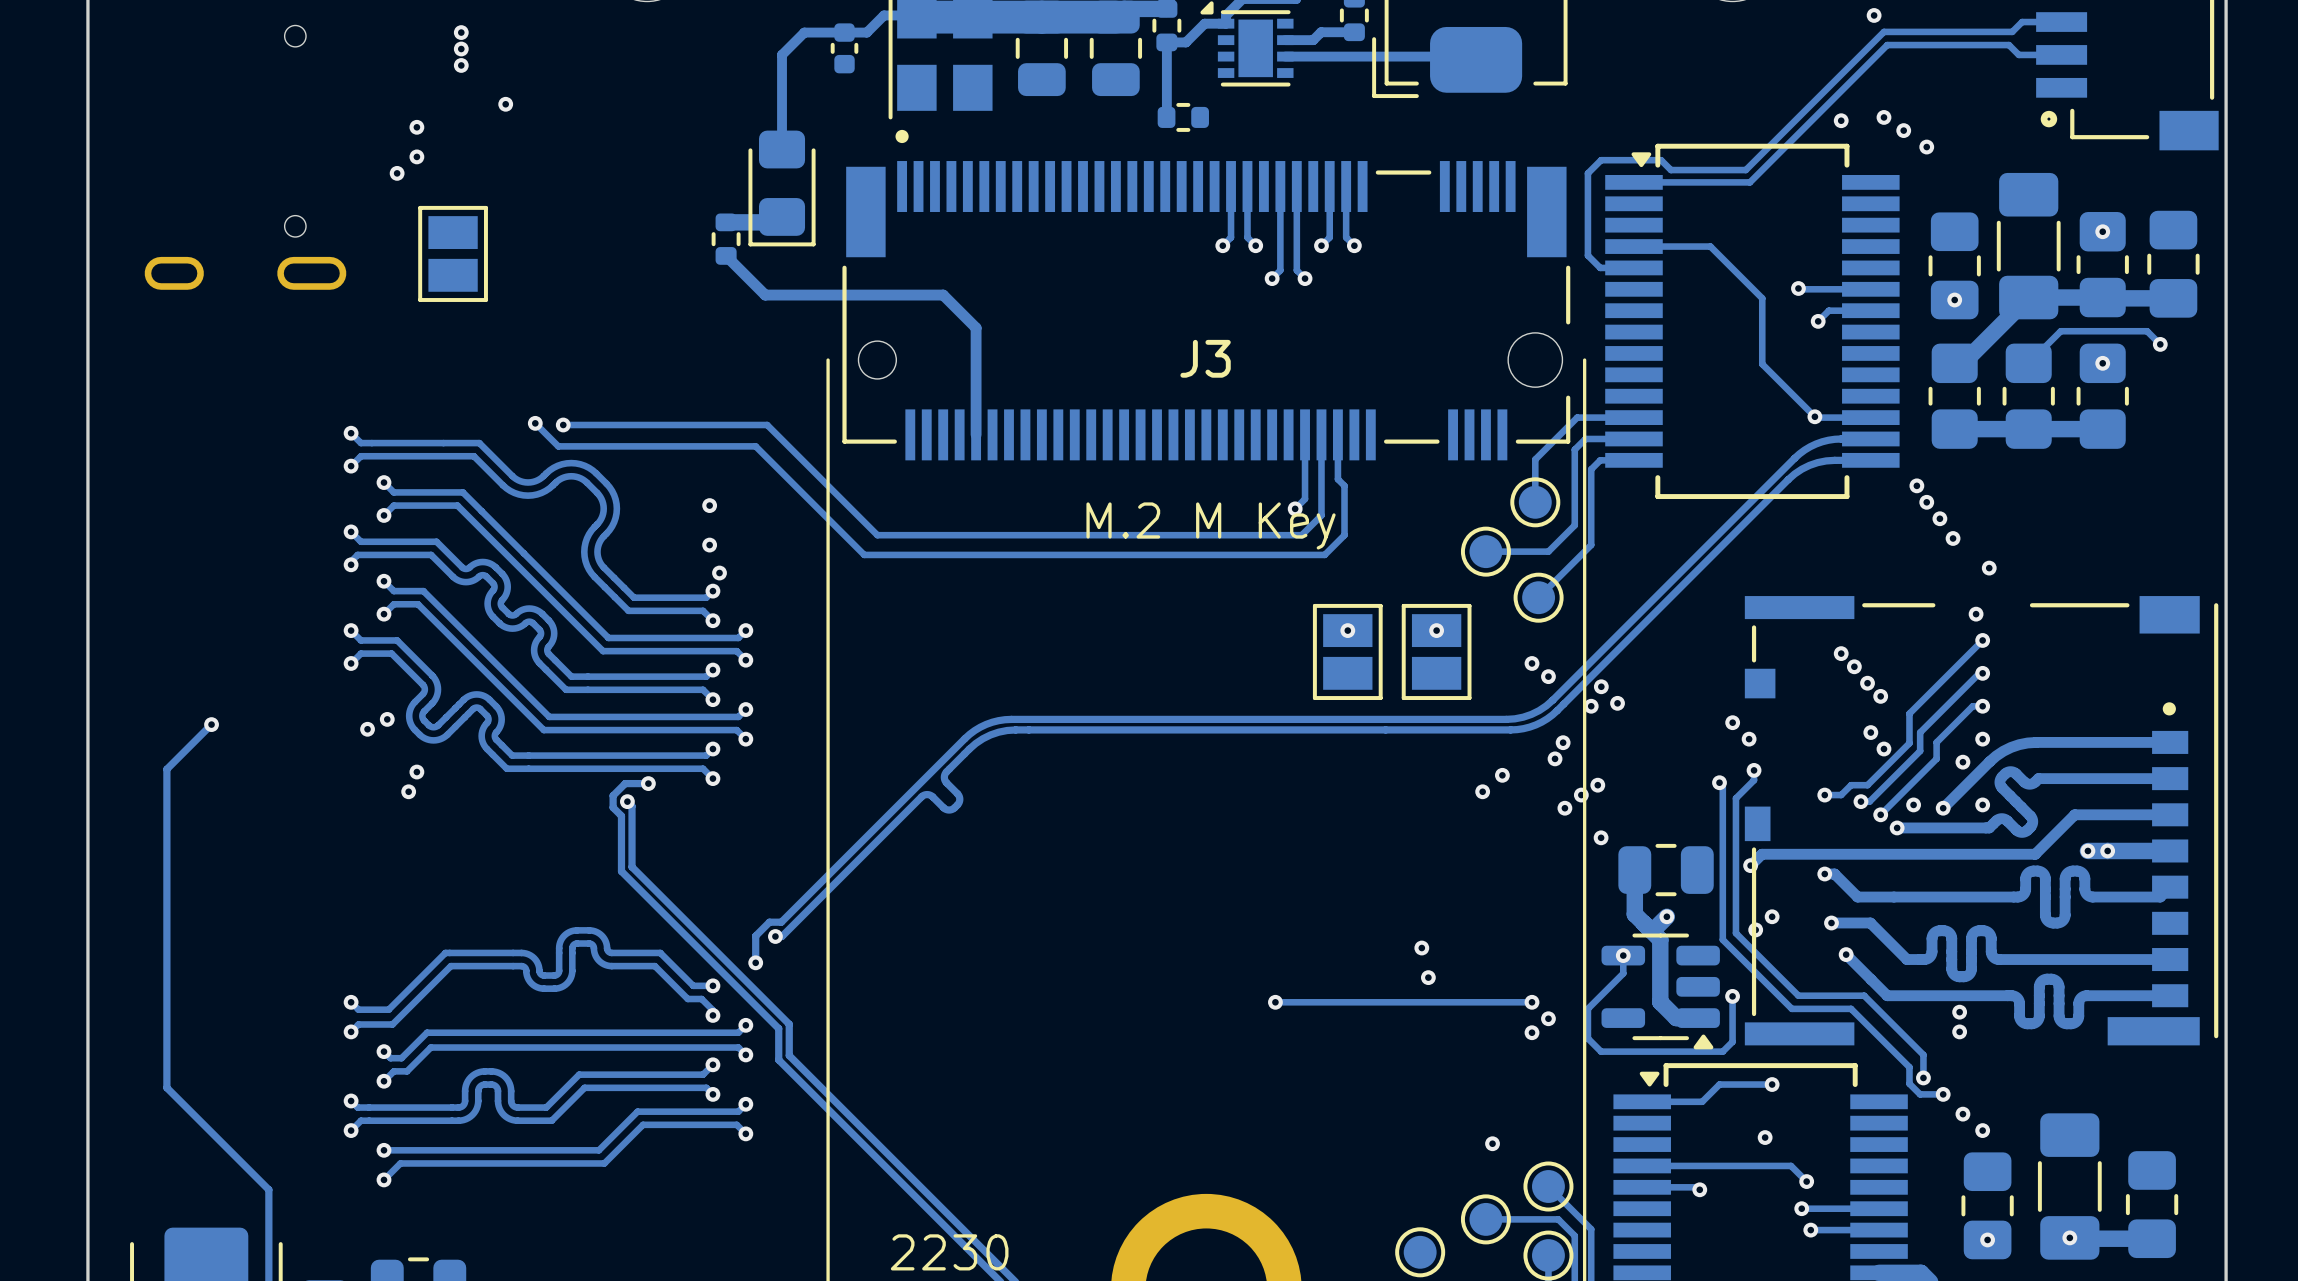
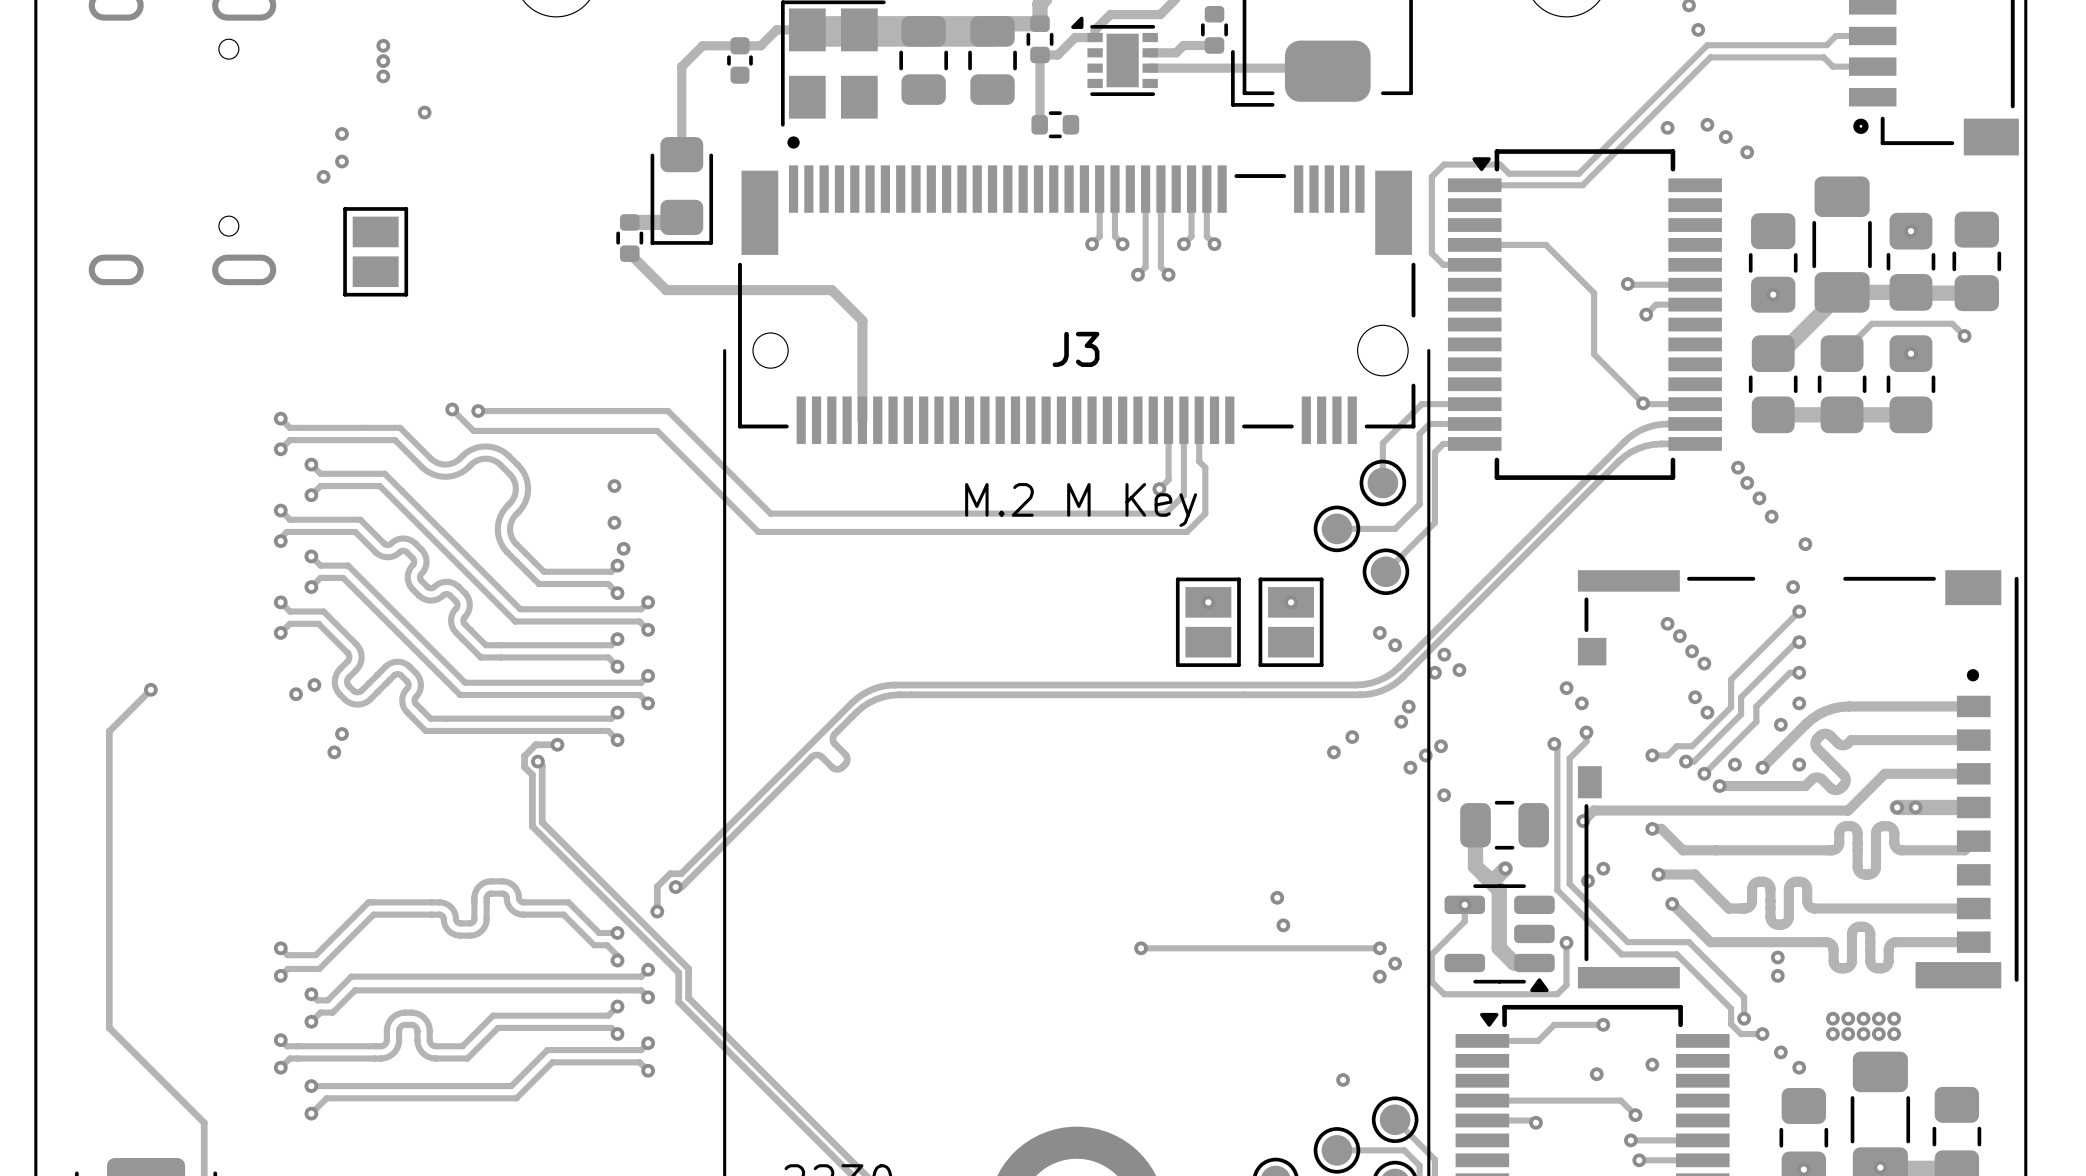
via: none -> (1832, 1018)
via: none -> (1848, 1018)
via: none -> (1863, 1018)
via: none -> (1878, 1018)
via: none -> (1894, 1018)
via: none -> (1832, 1034)
via: none -> (1848, 1034)
via: none -> (1863, 1034)
via: none -> (1878, 1034)
via: none -> (1894, 1034)
via: none -> (1652, 1064)

